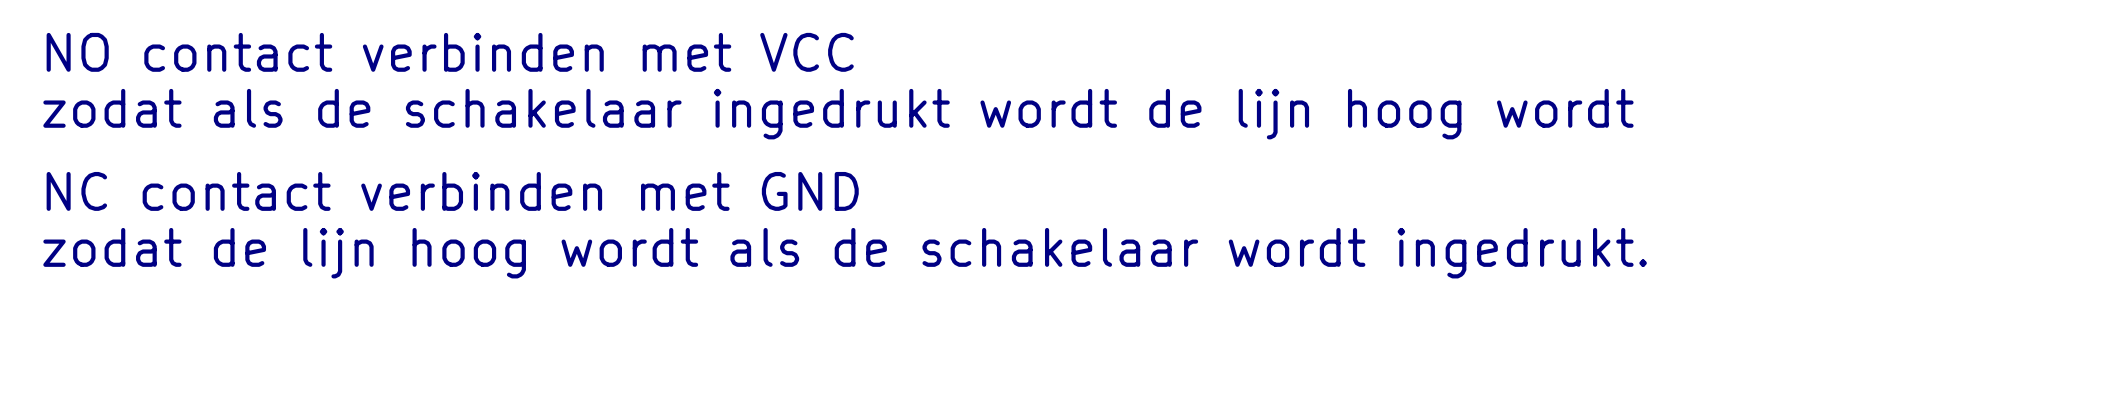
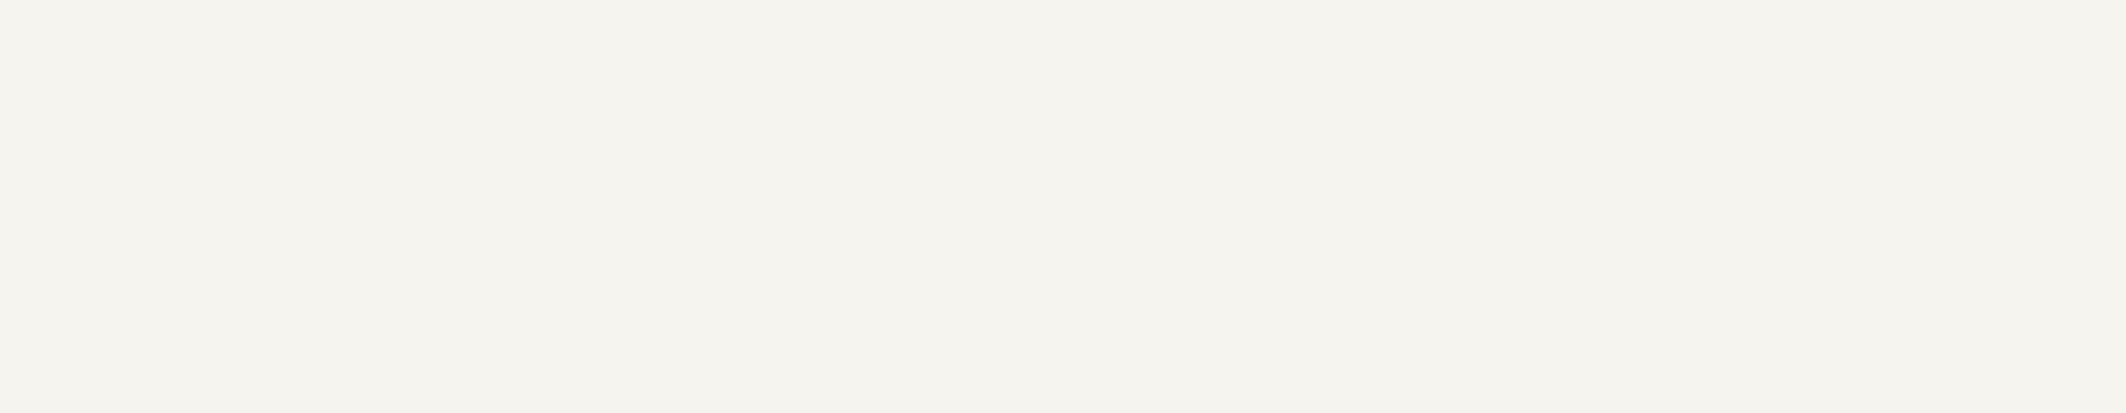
text: NO contact verbinden met VCC (450, 52) -> none
text: zodat als de schakelaar ingedrukt wordt de lijn hoog wordt (838, 114) -> none
text: NC contact verbinden met GND (452, 191) -> none
text: zodat de lijn hoog wordt als de schakelaar wordt ingedrukt. (845, 253) -> none

